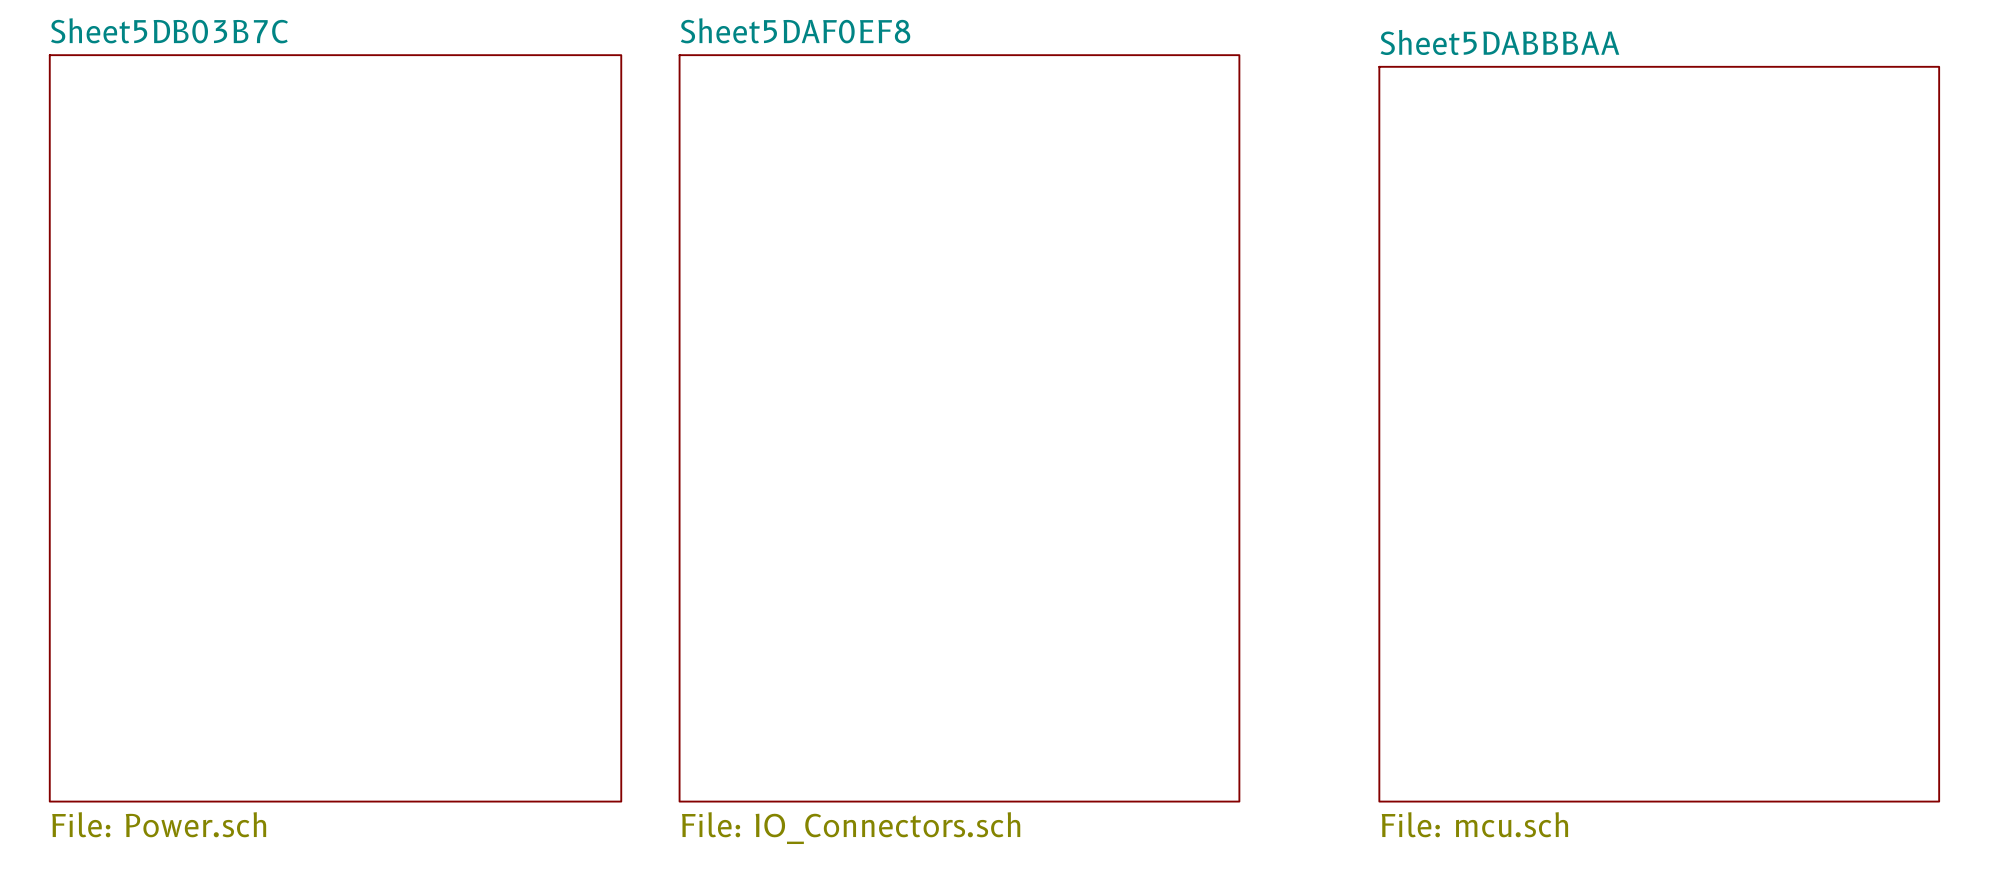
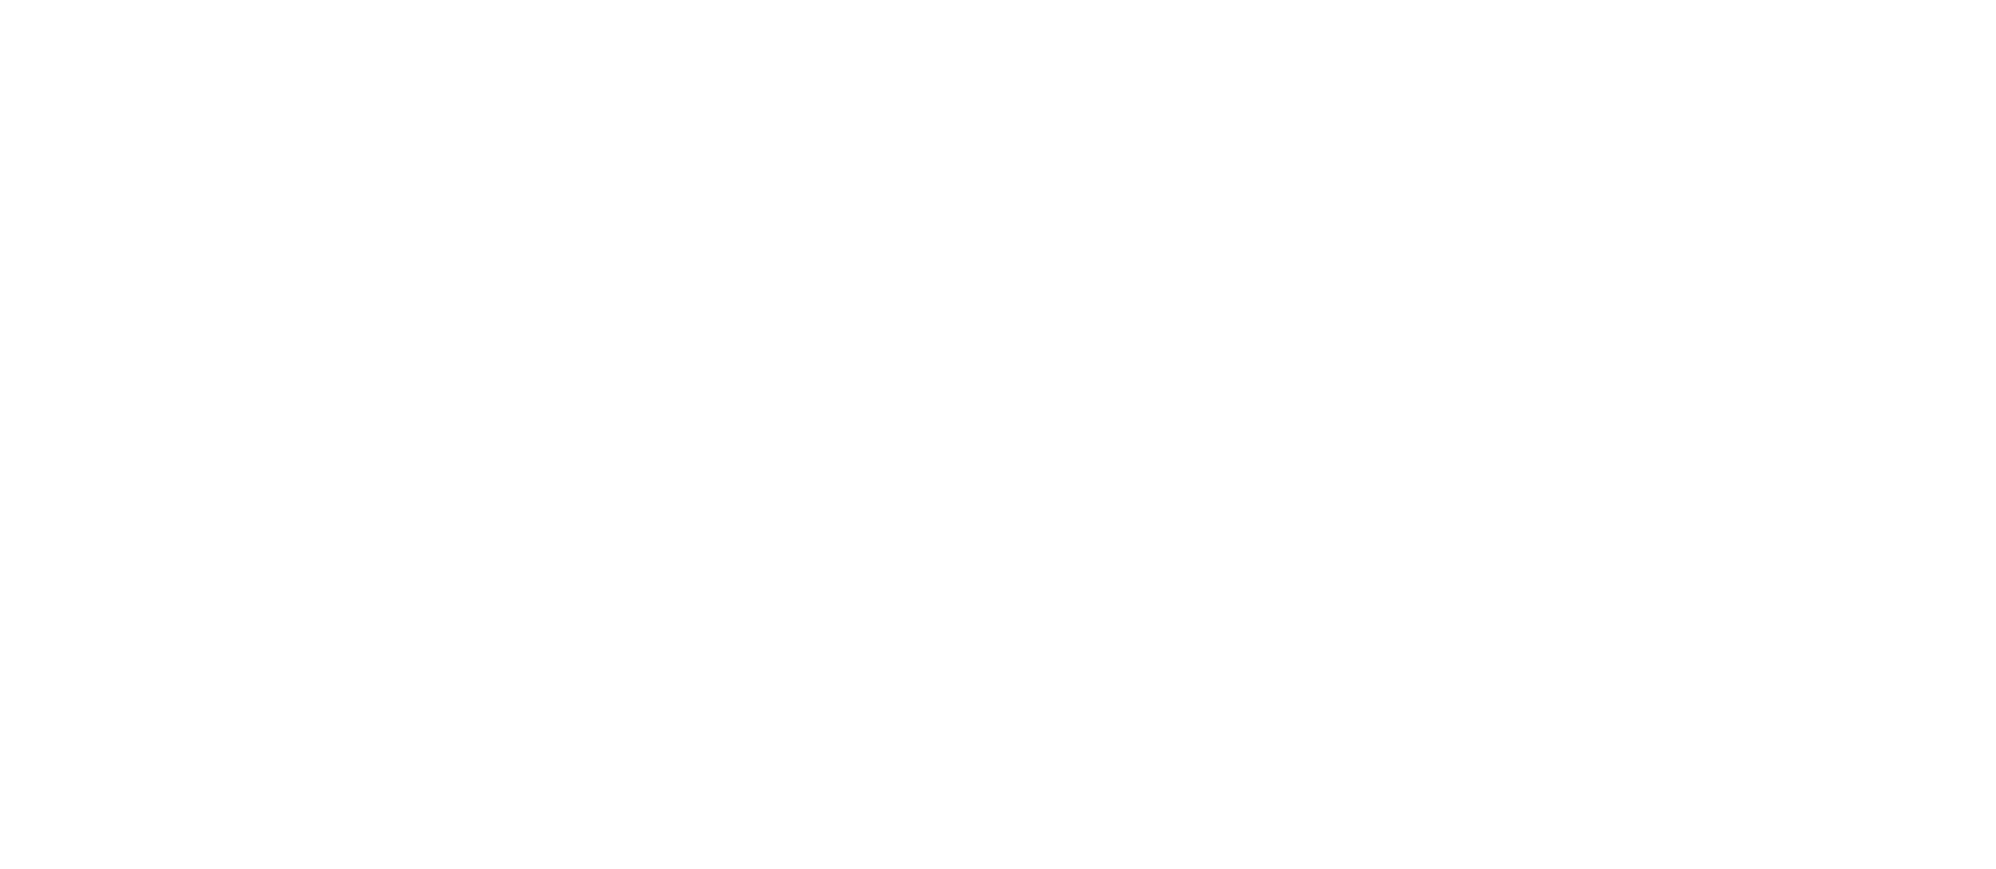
sheet Sheet5DB03B7C: File: Power.sch (335, 428) -> none
sheet Sheet5DAF0EF8: File: IO_Connectors.sch (959, 428) -> none
sheet Sheet5DABBBAA: File: mcu.sch (1659, 434) -> none

